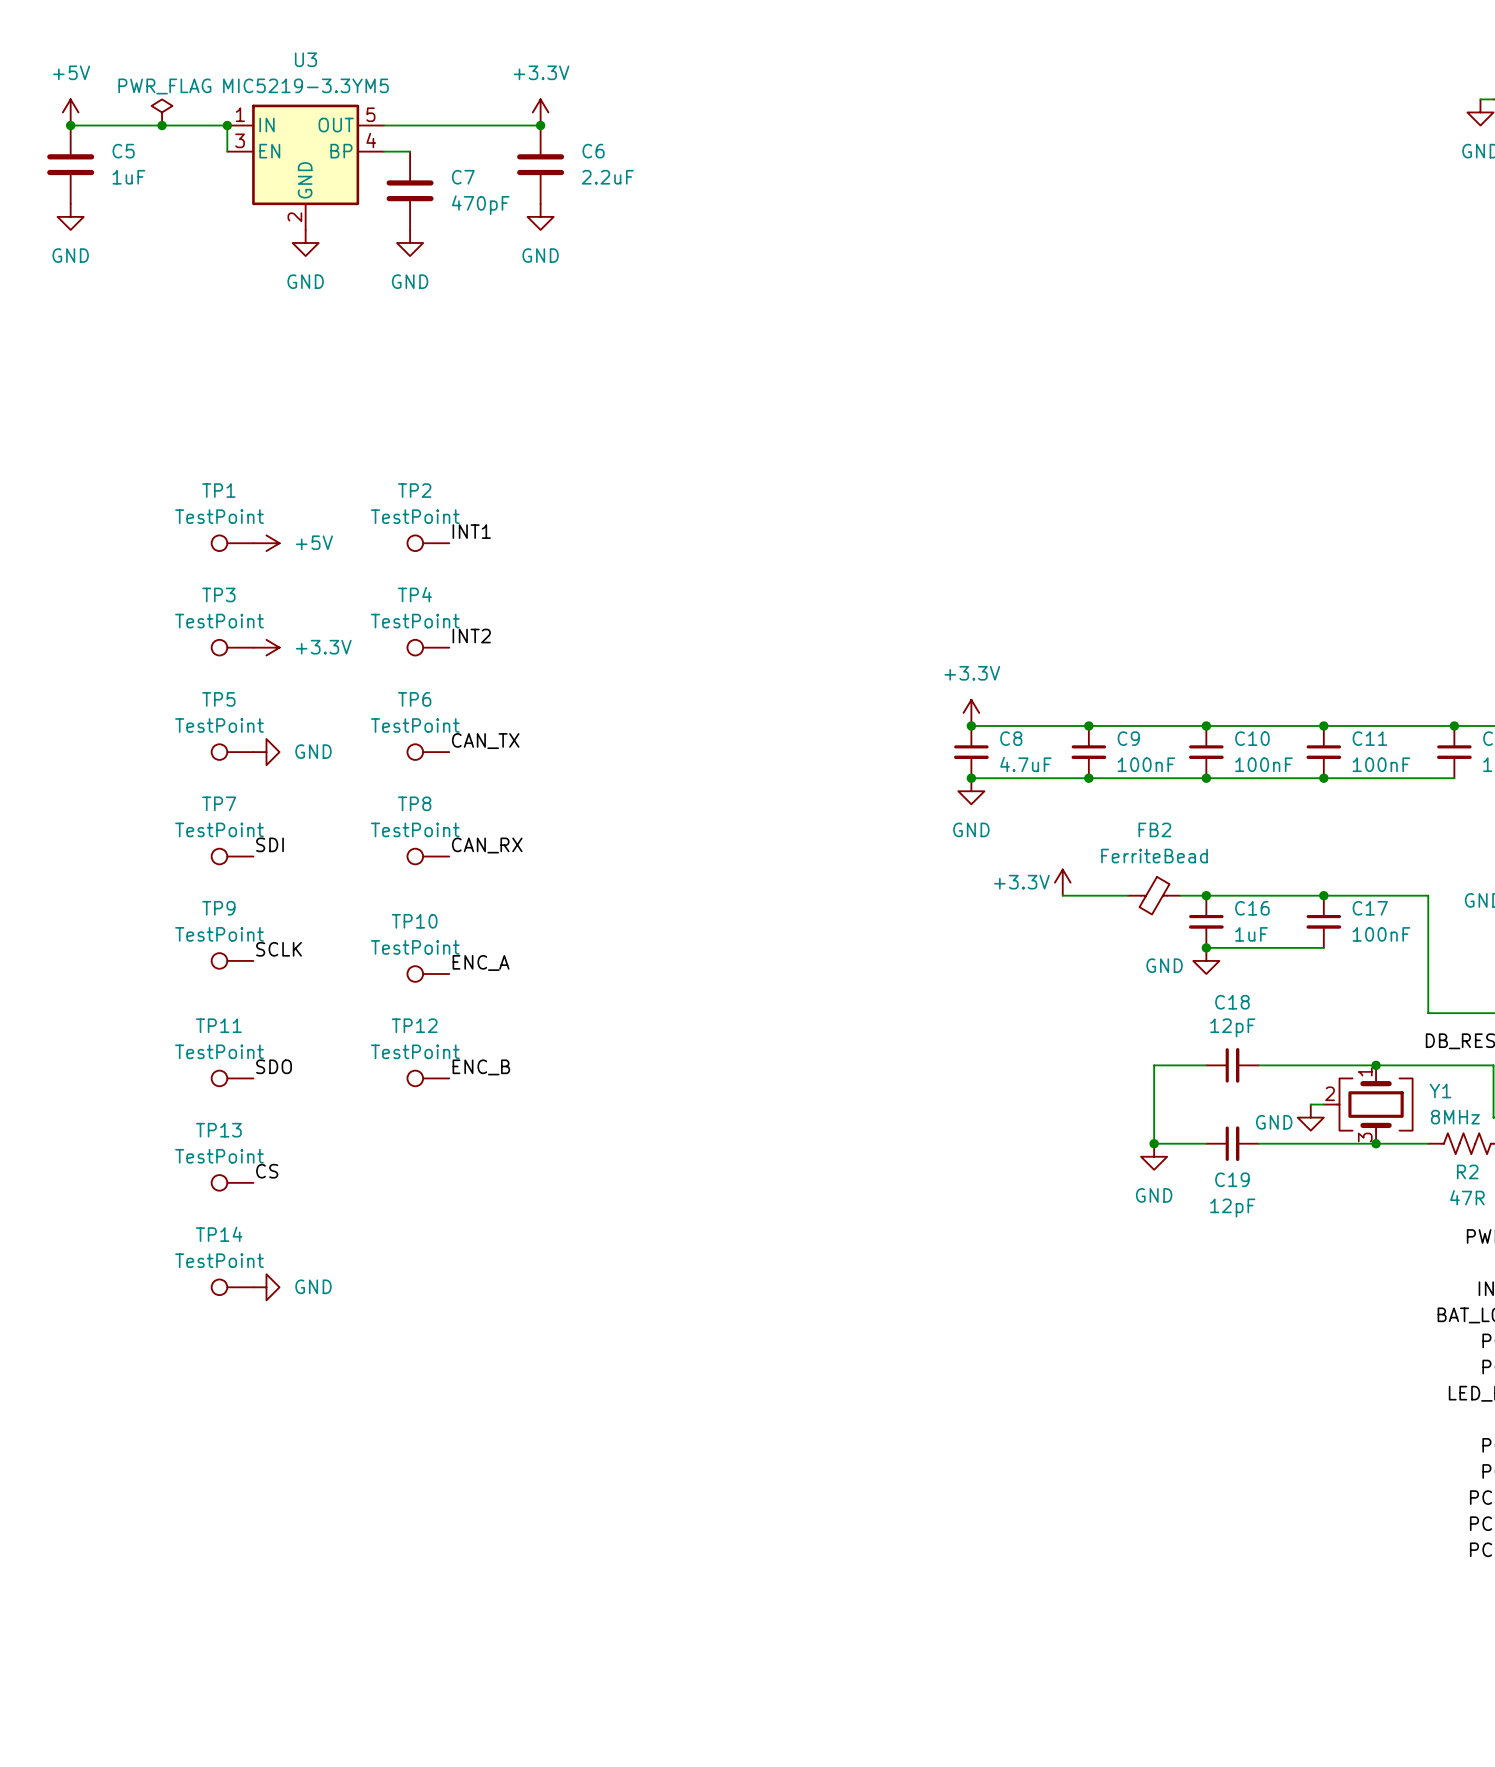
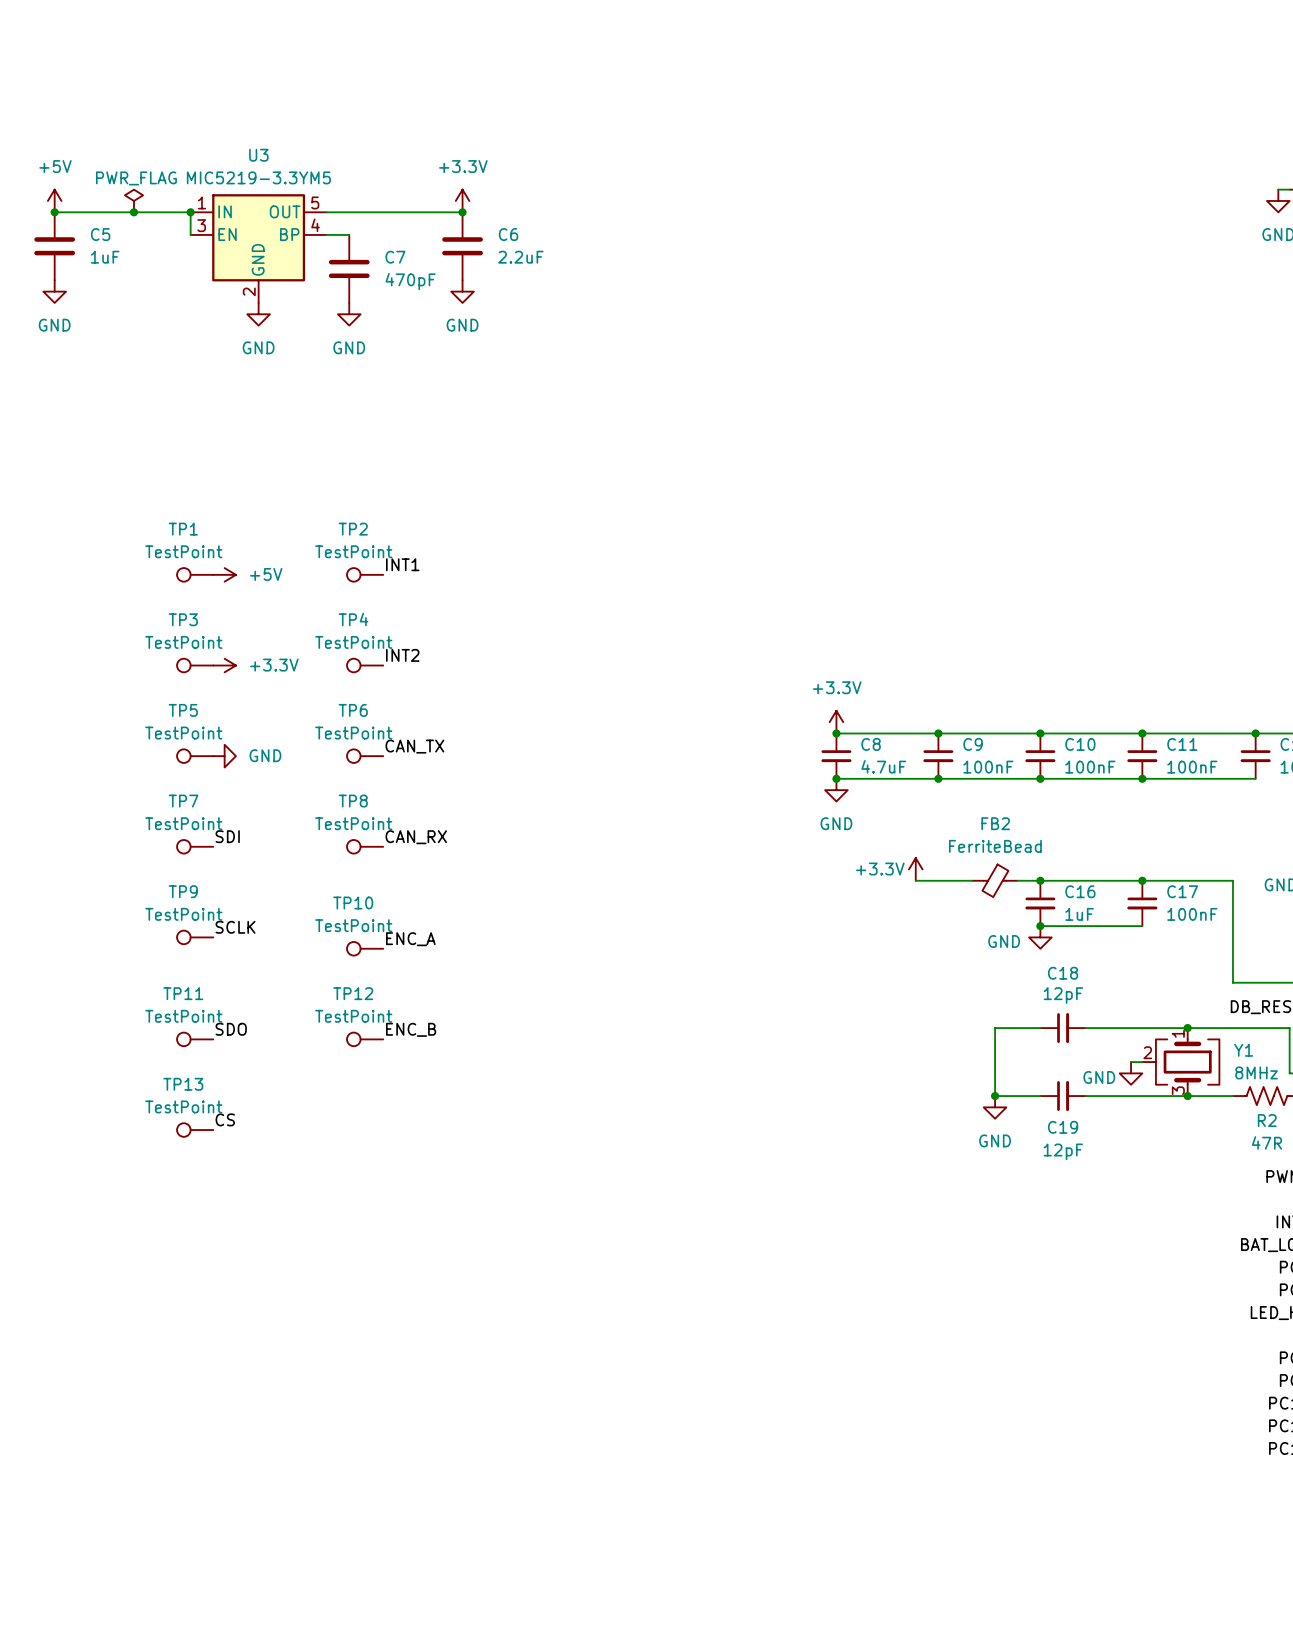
TP14: TestPoint (232, 1287) -> none
power symbol: GND (266, 1287) -> none

